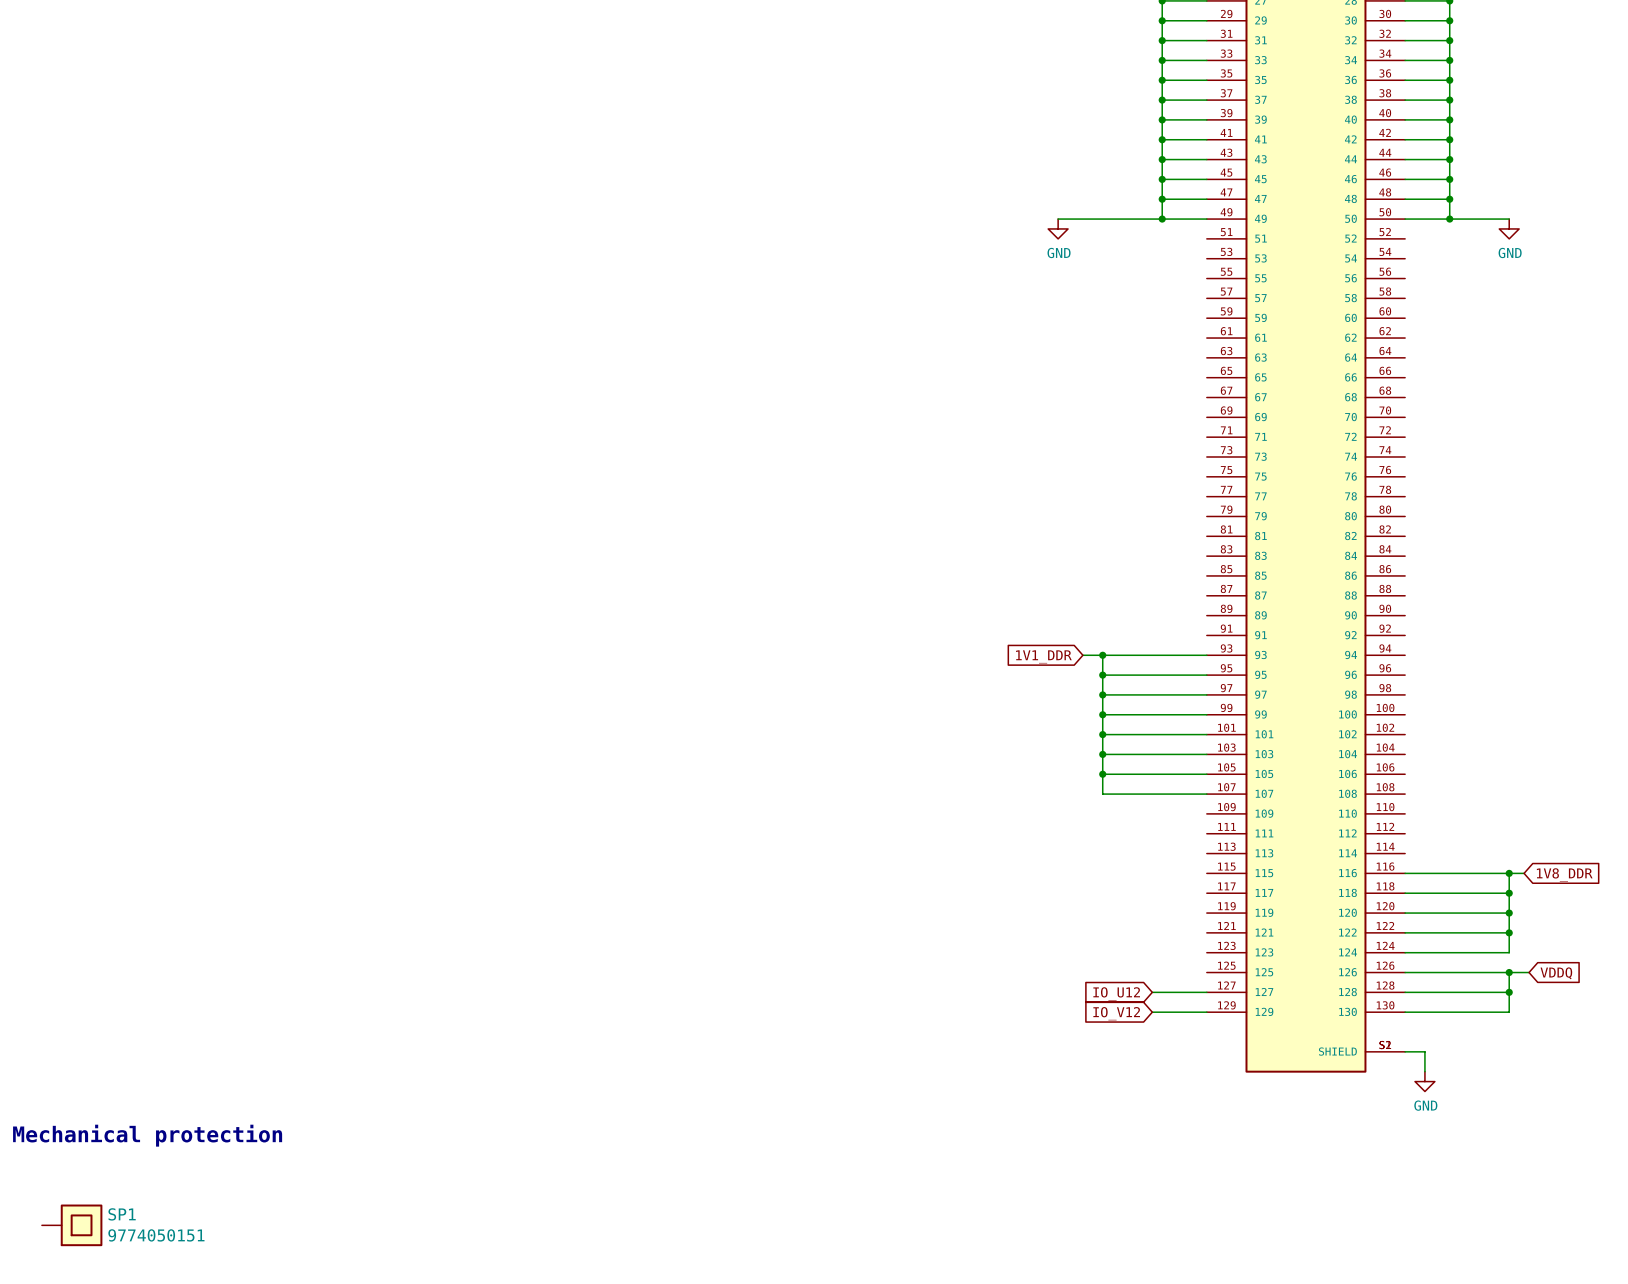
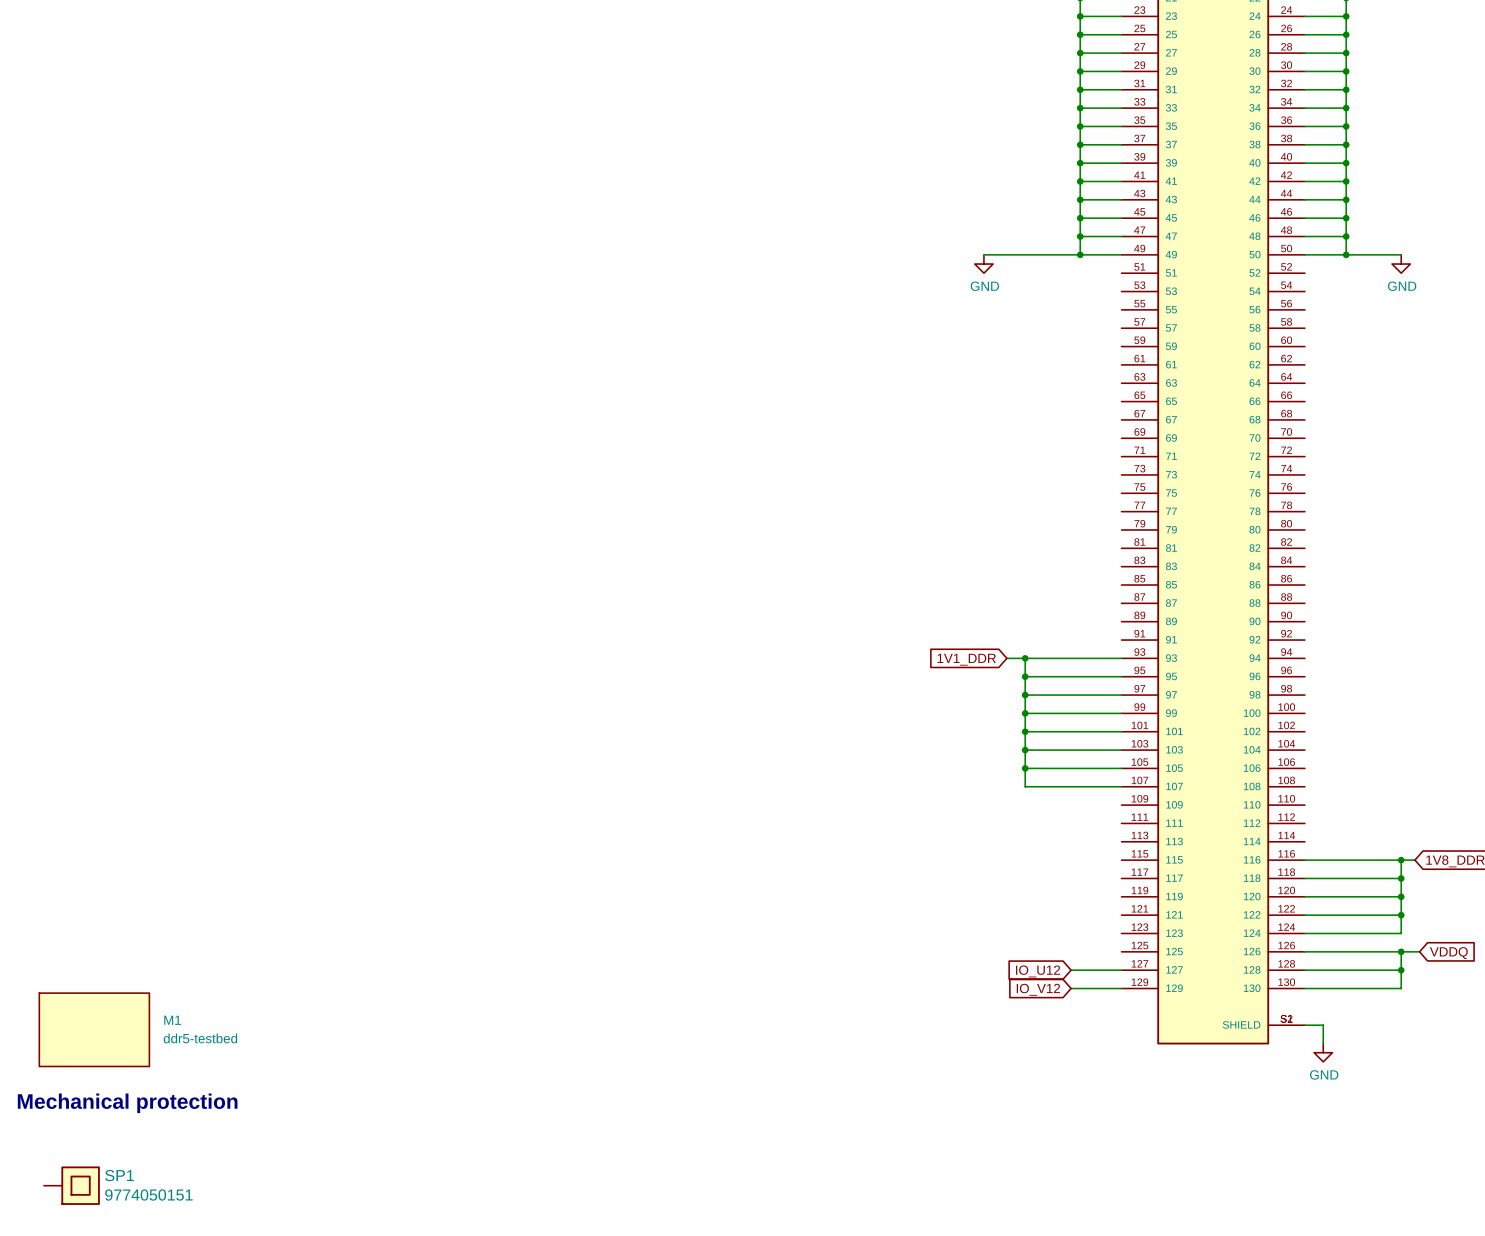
M1: none -> ddr5-testbed (94, 1029)

